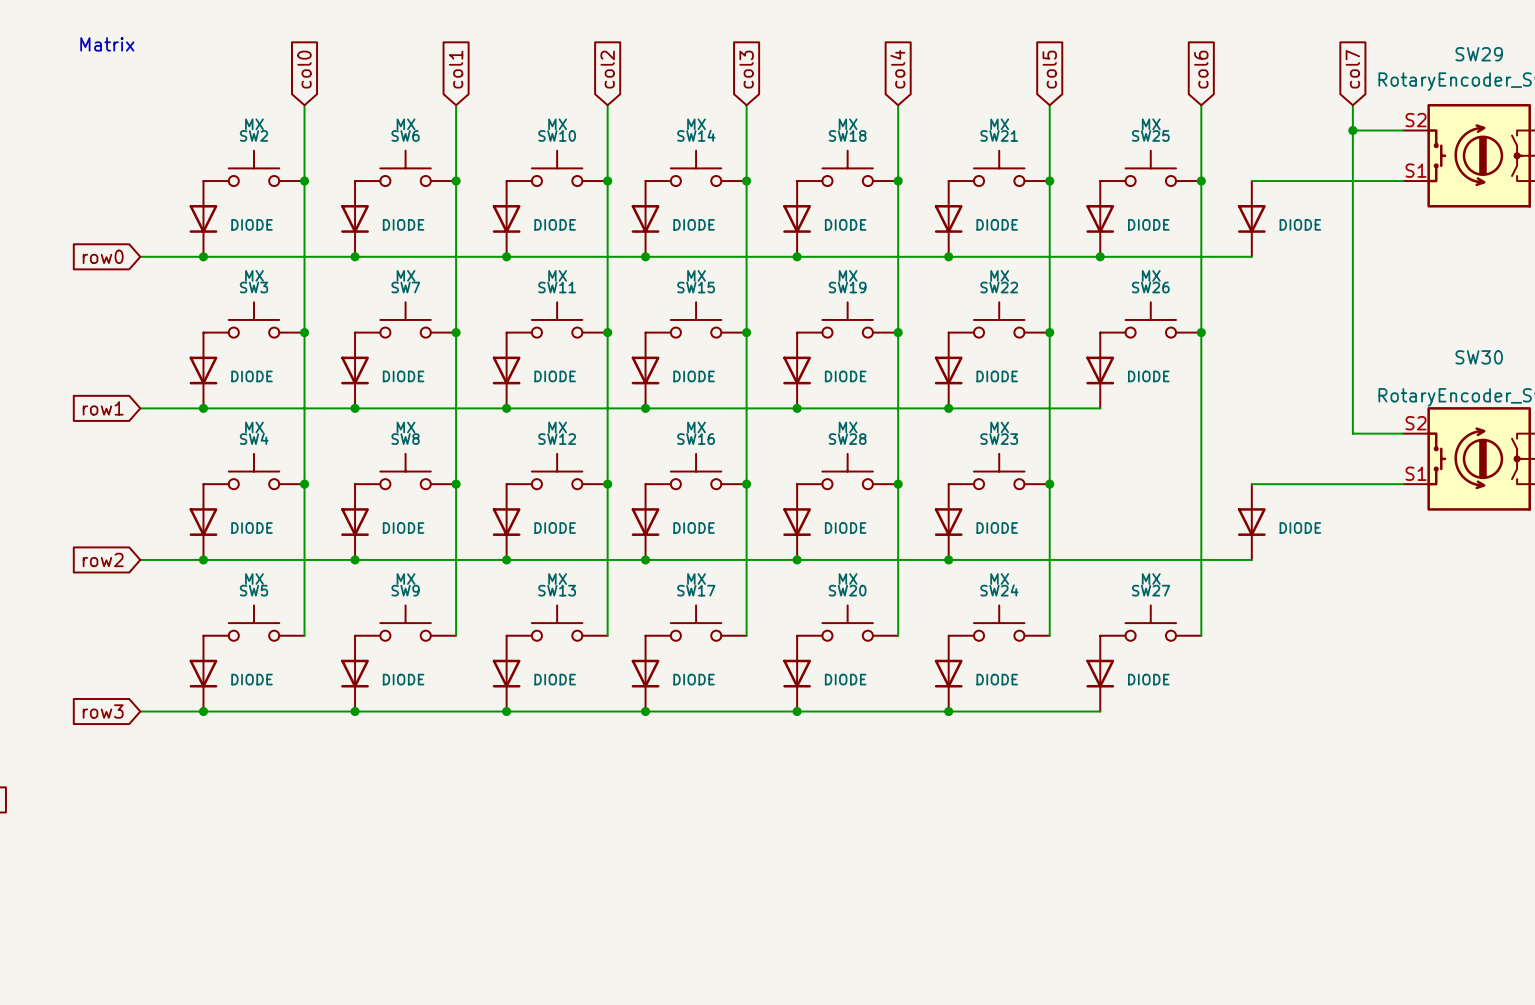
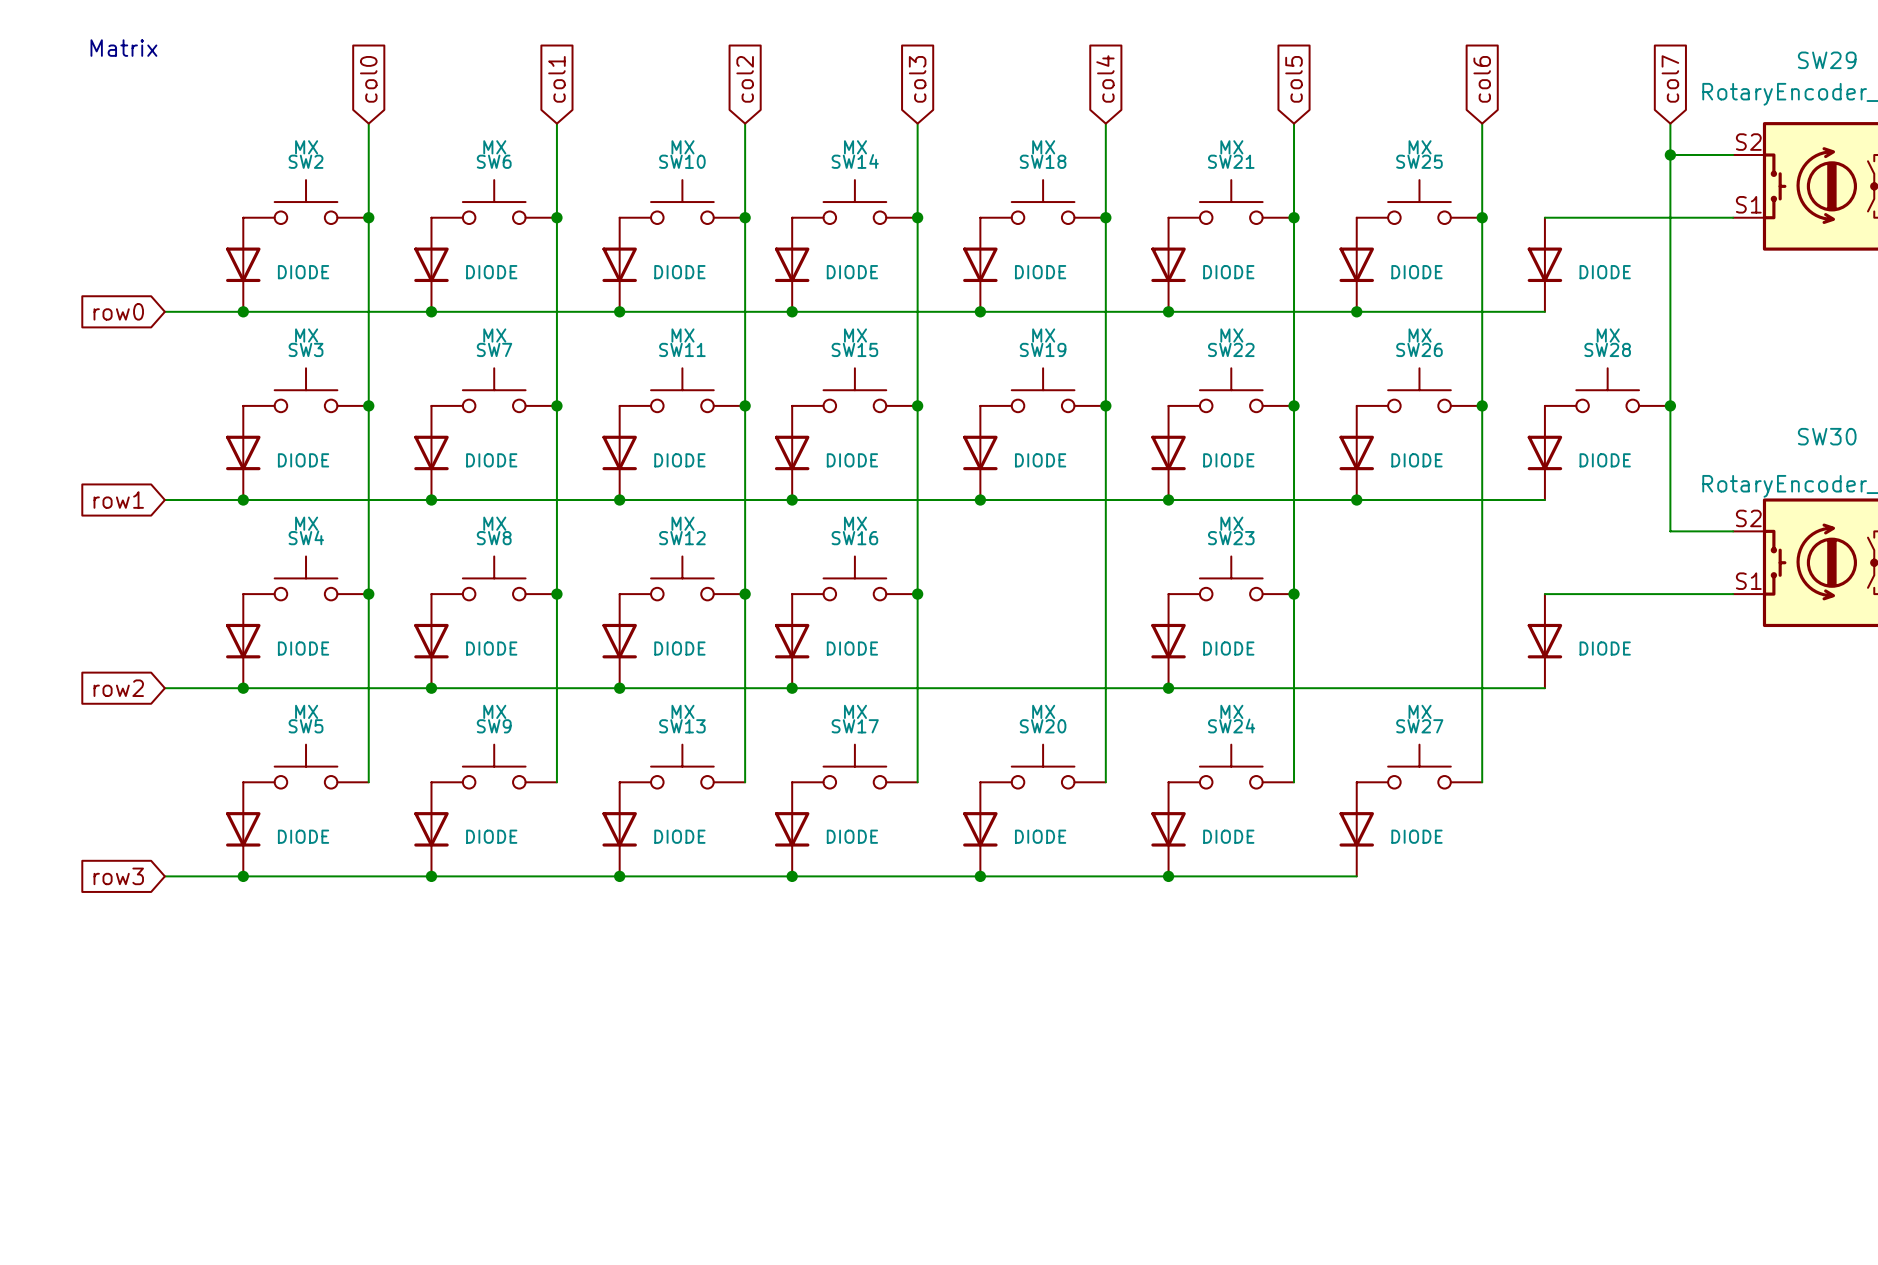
junction: none -> (1670, 405)
part: none -> DIODE (1544, 452)
wire: none -> (1356, 500) (1544, 500)
junction: none -> (1356, 500)
SW28 position: (847, 471) -> (1607, 390)
junction: (898, 484) -> none
part: DIODE (797, 522) -> none
junction: (797, 559) -> none

